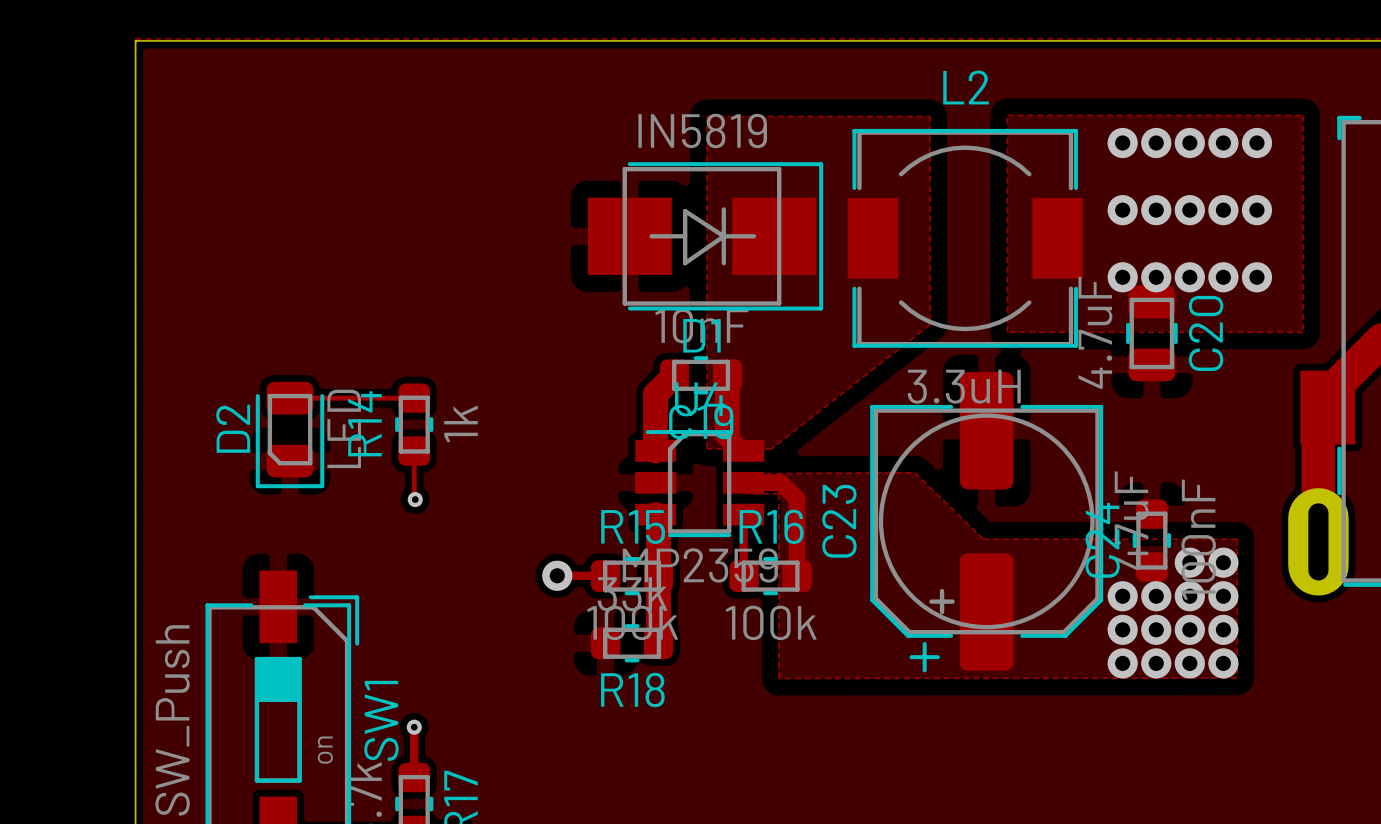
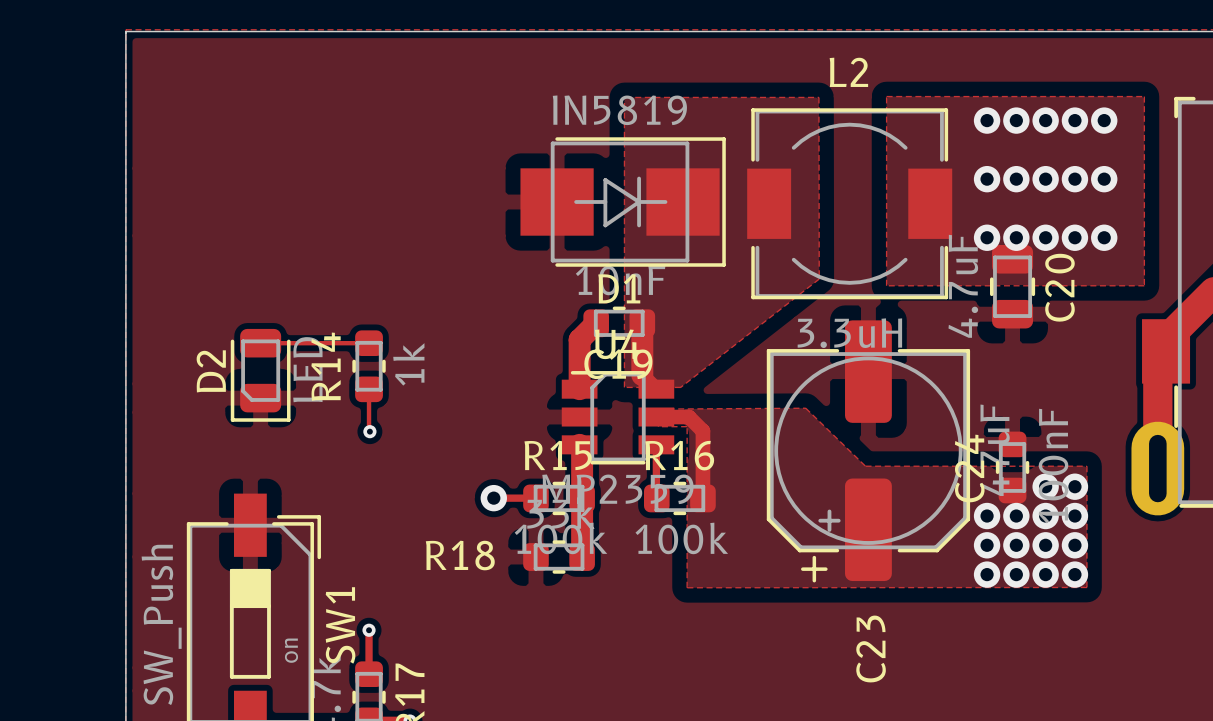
C23 name position: C23 (839, 521) -> C23 (871, 649)
R18 name position: R18 (632, 689) -> R18 (460, 555)

